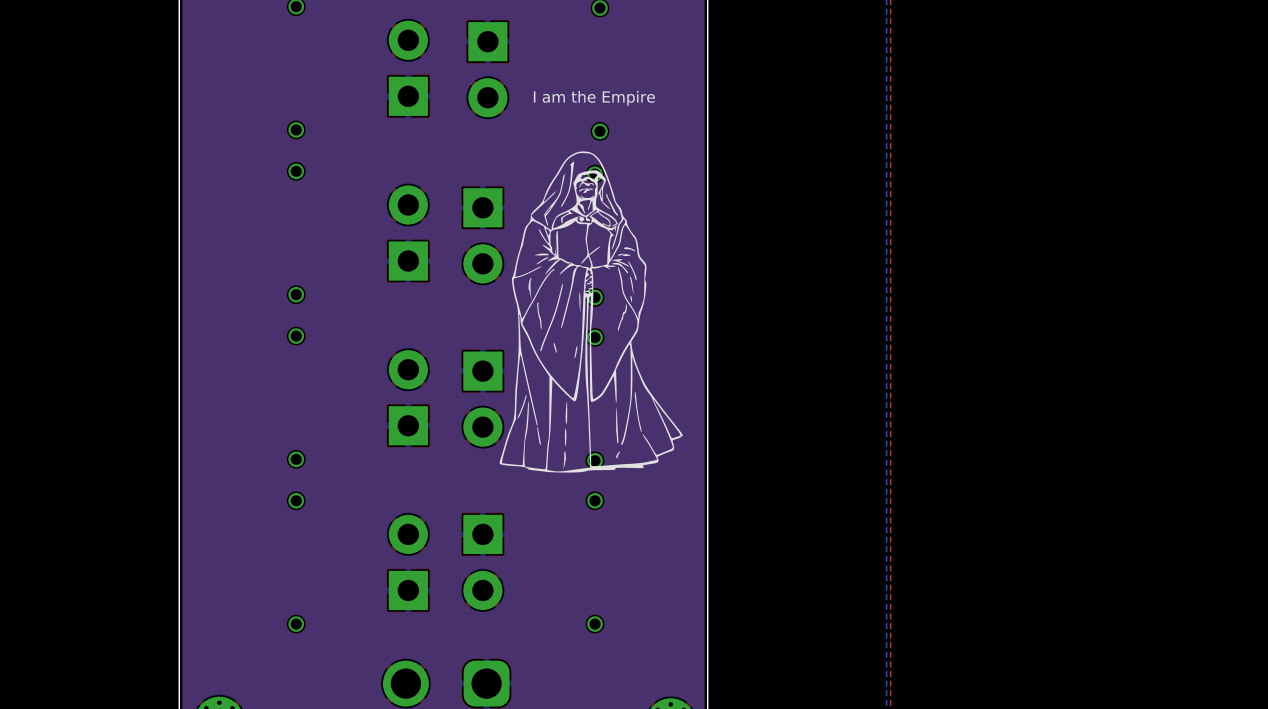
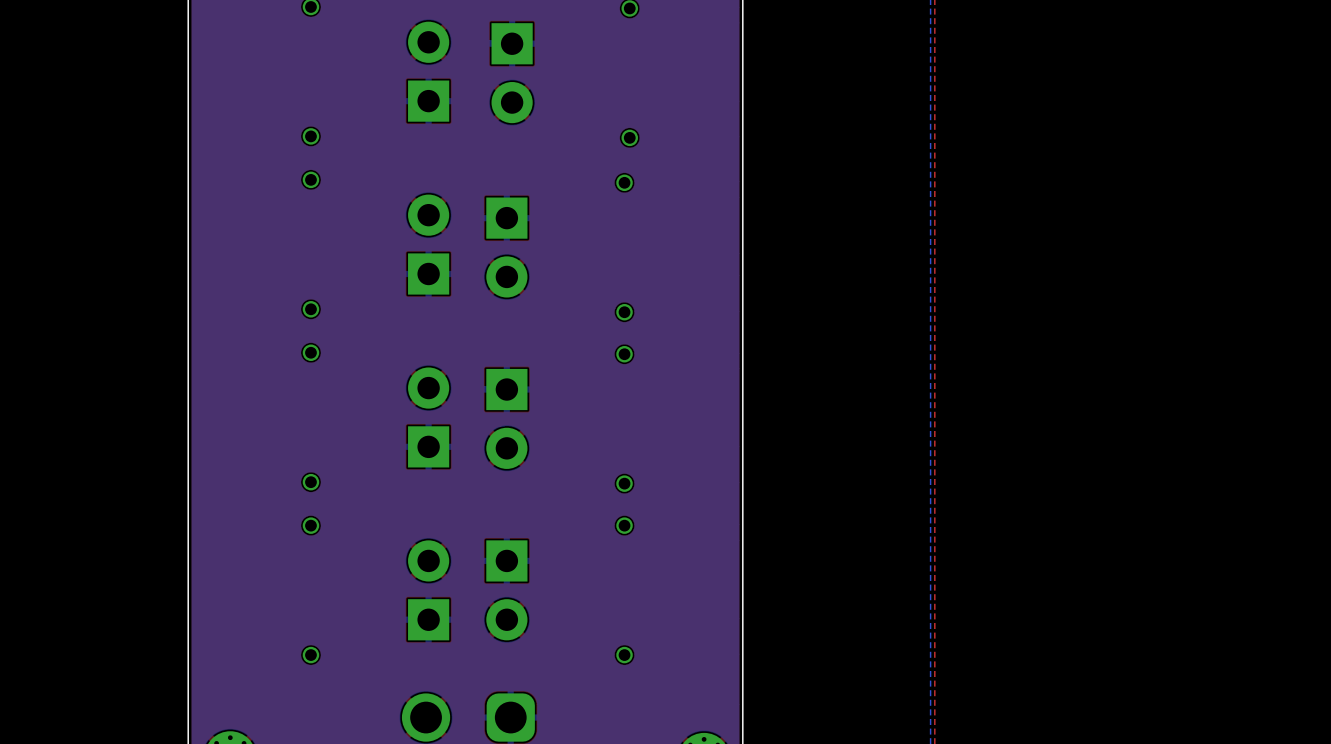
text: I am the Empire (594, 98) -> none
drawing: [499, 151, 683, 473] -> none

